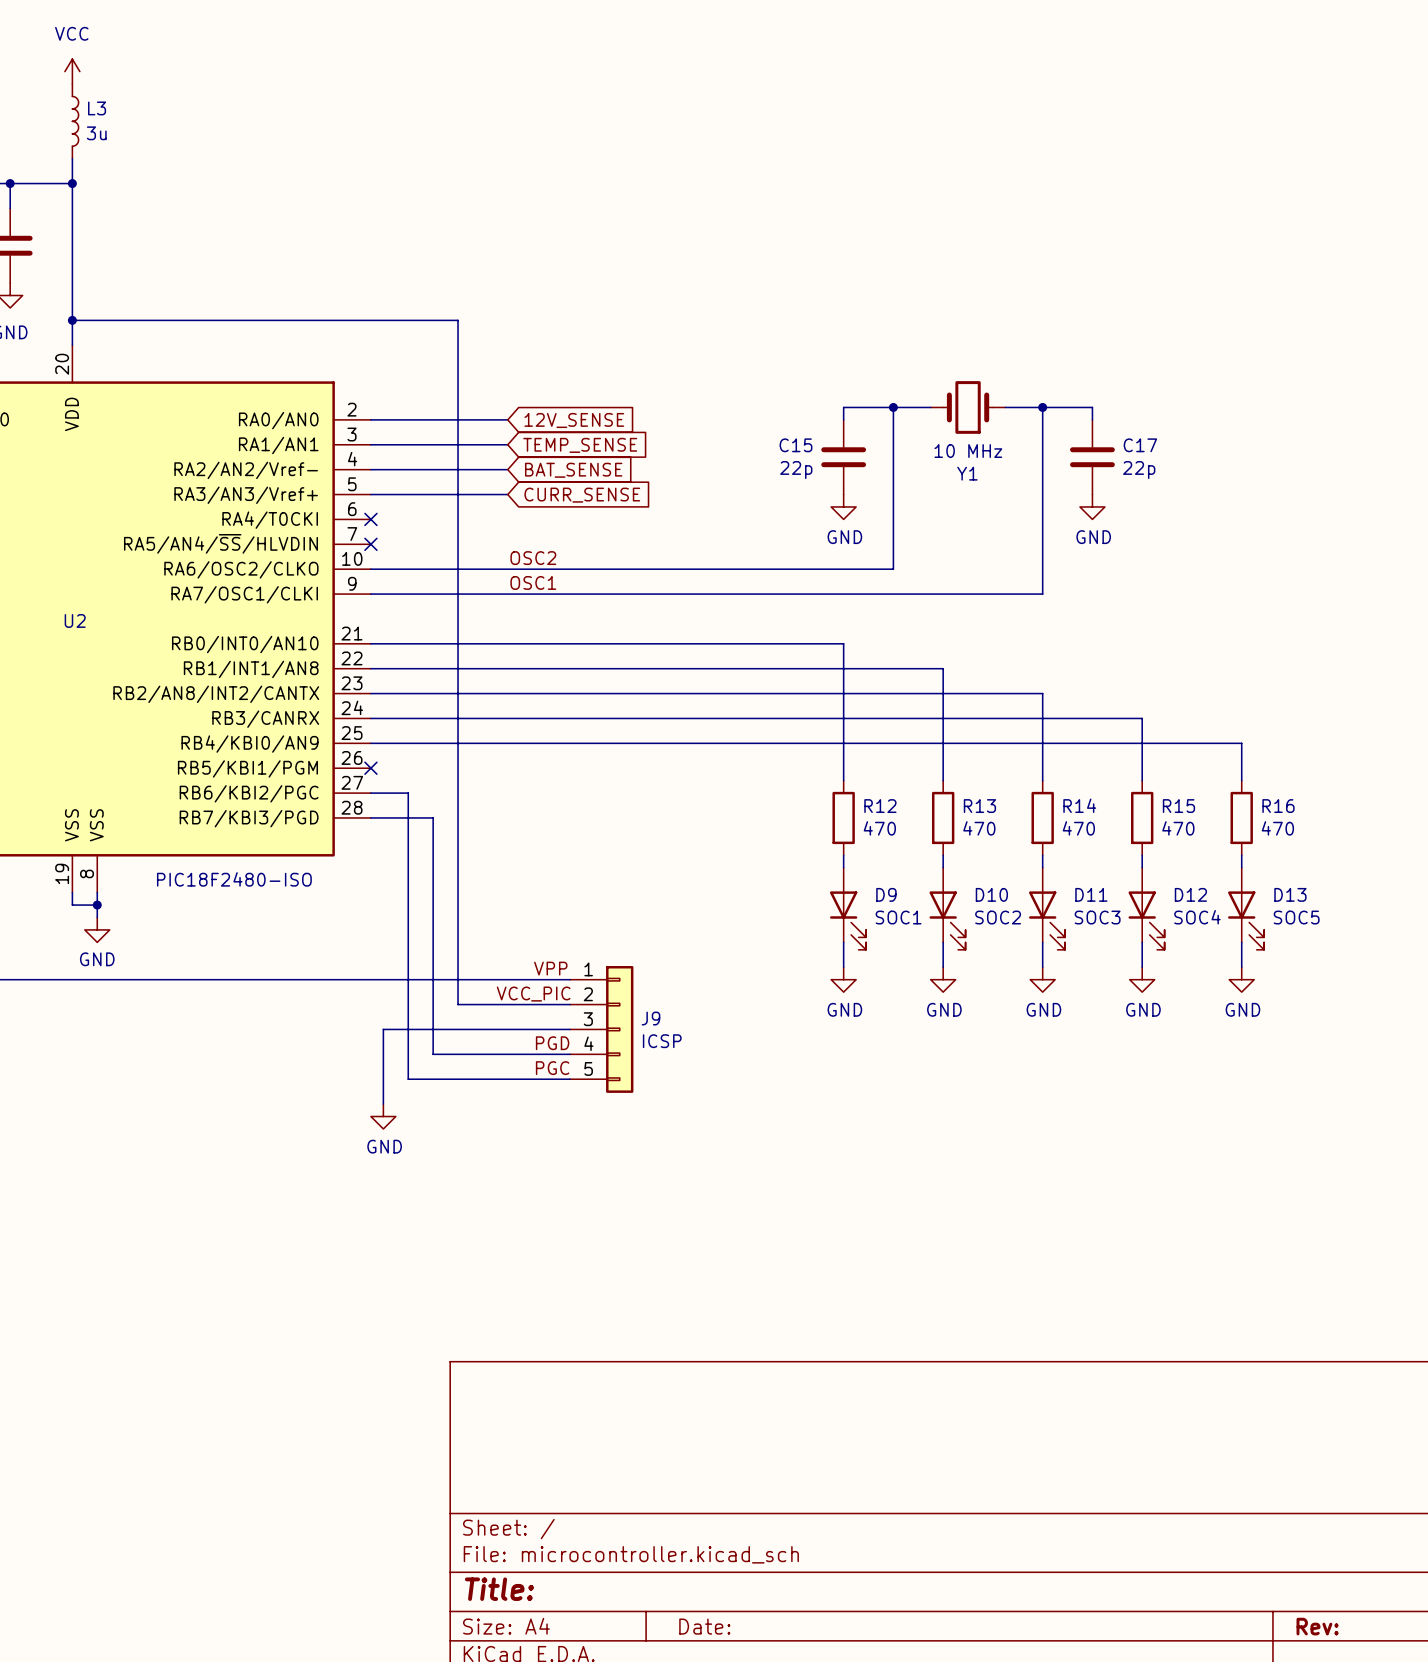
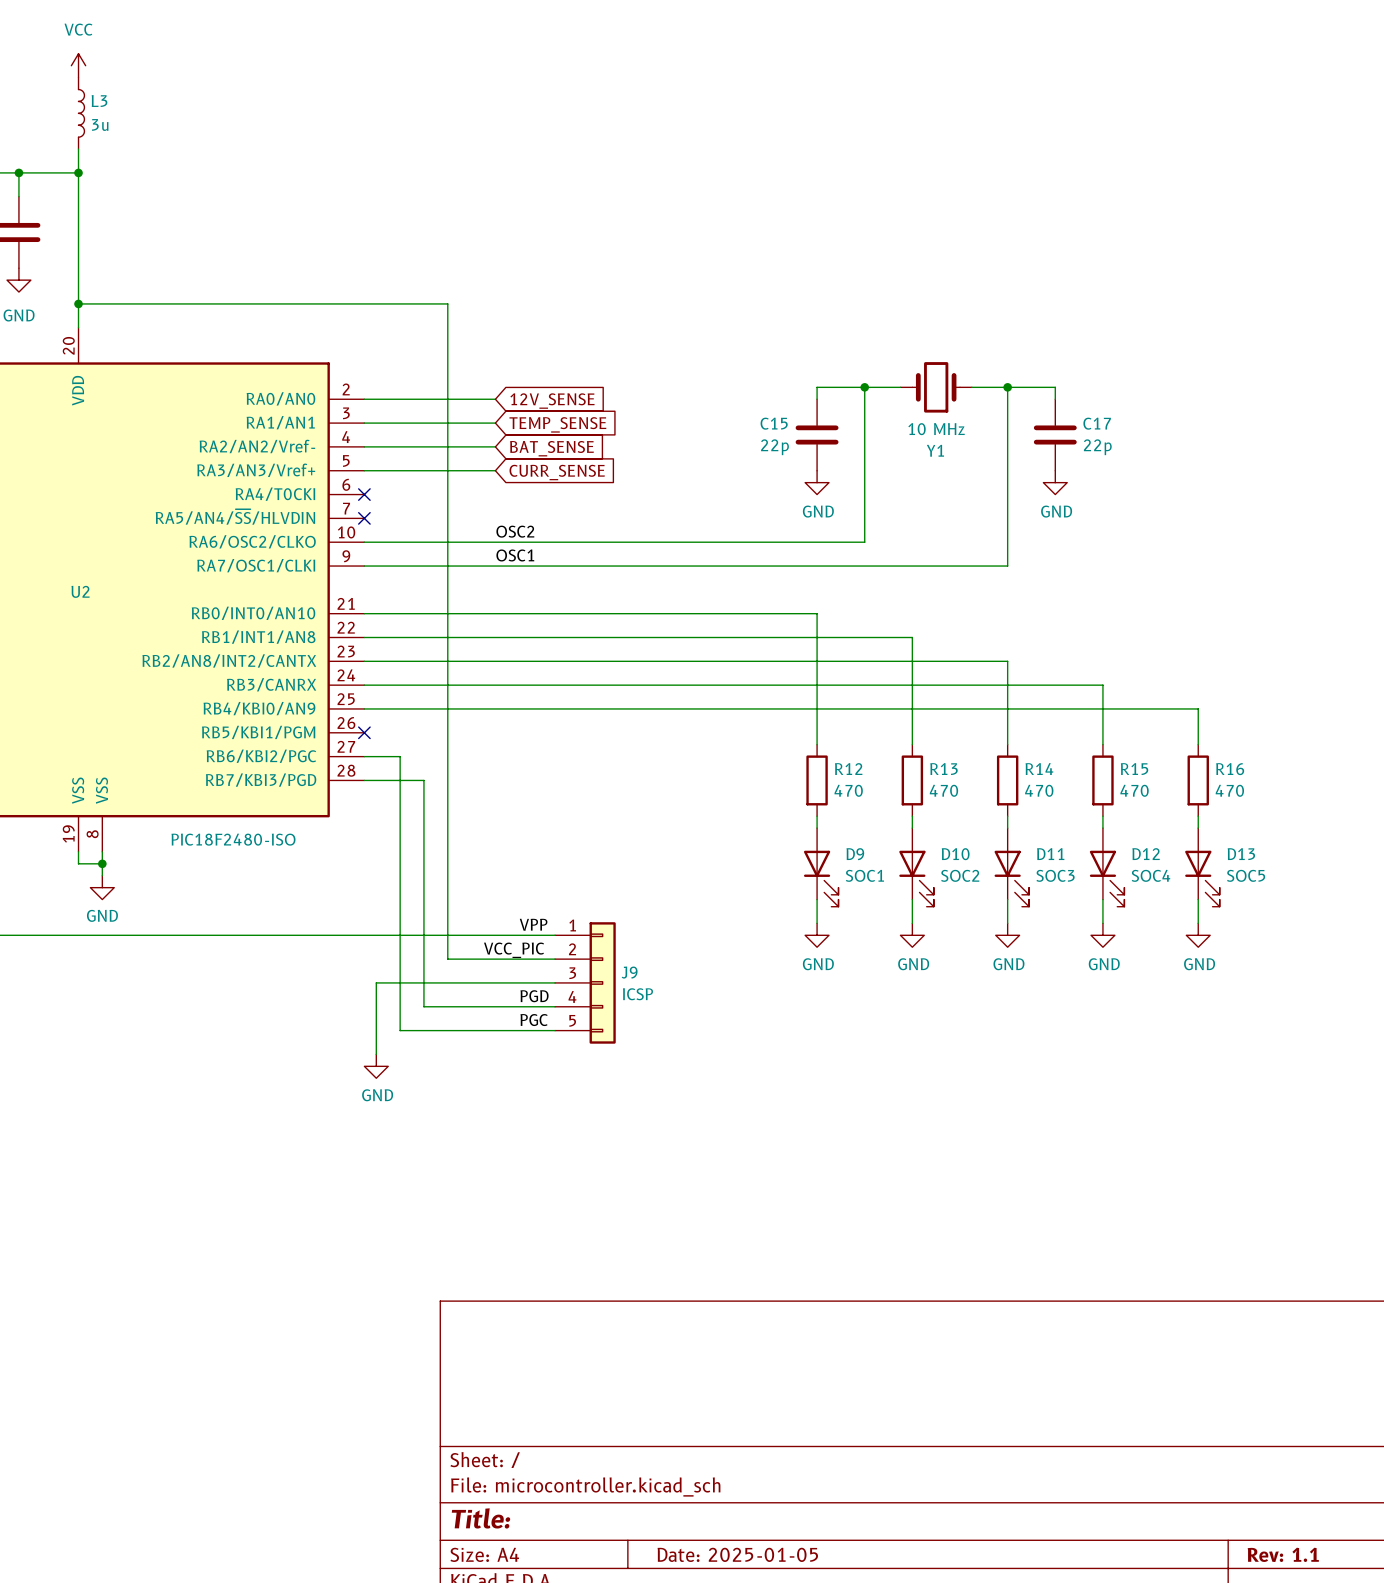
title block: Date: (704, 1626) -> Date: 2025-01-05 (737, 1554)
title block: Rev: (1317, 1626) -> Rev: 1.1 (1283, 1554)

